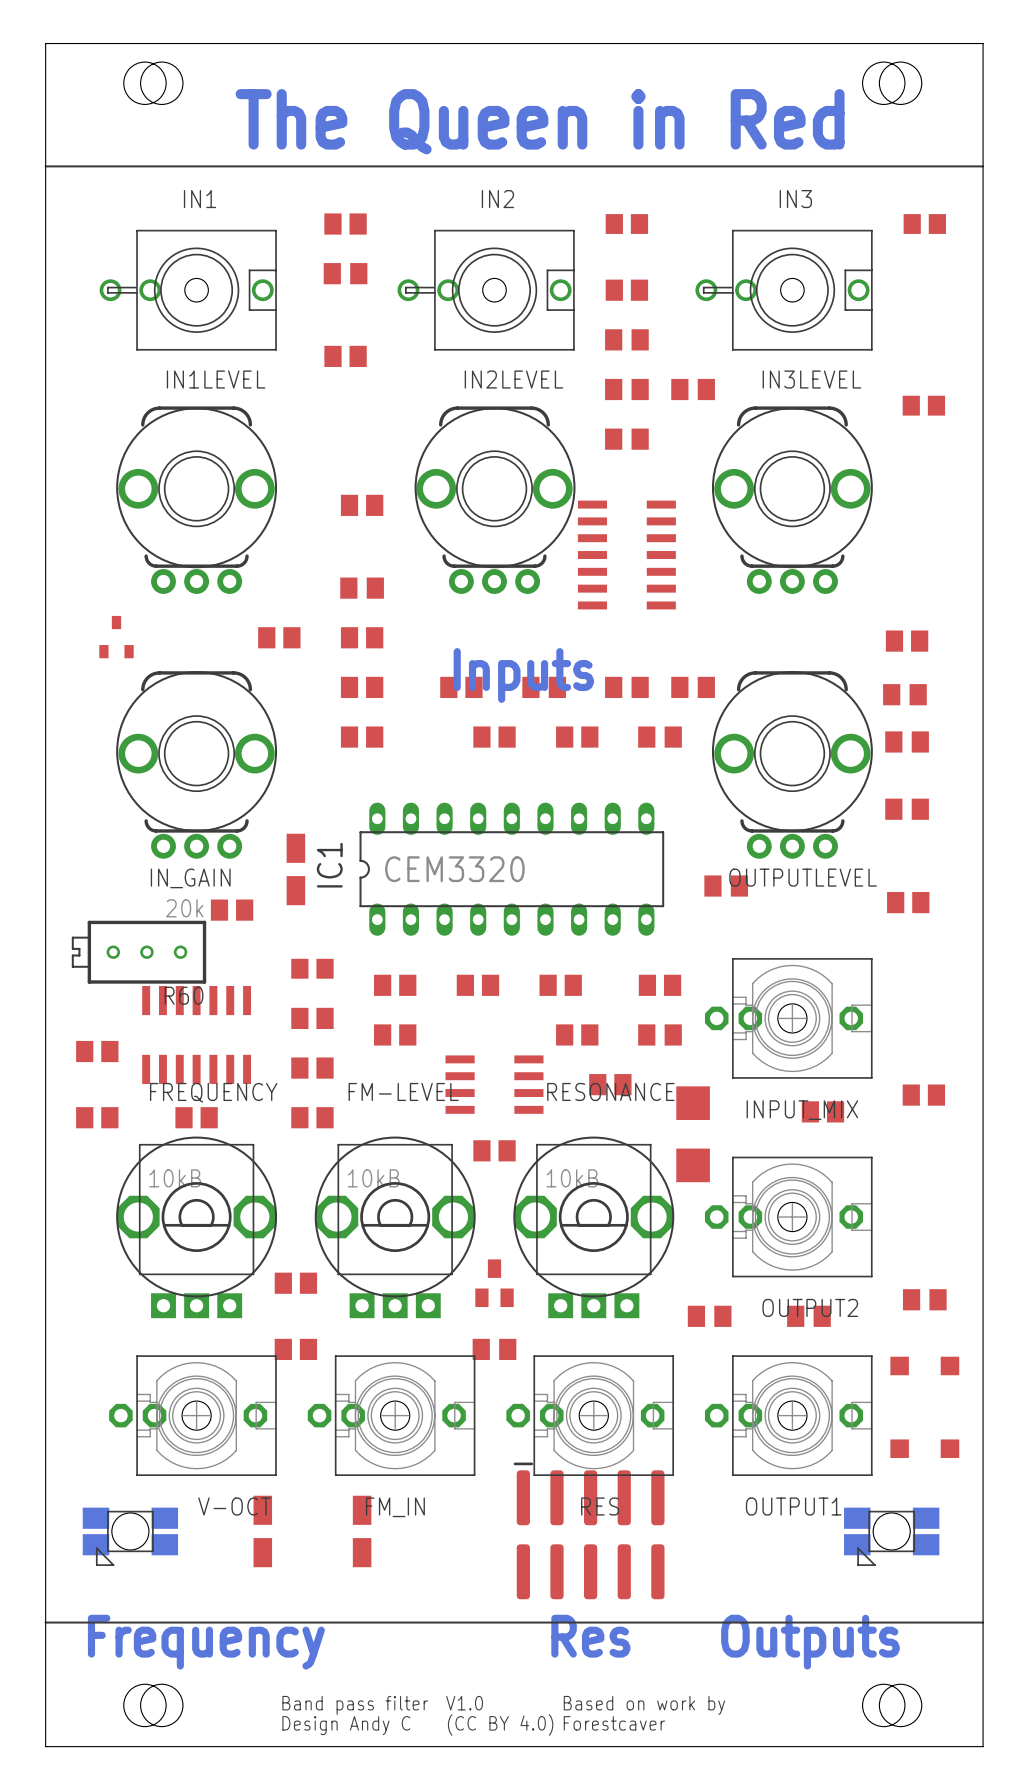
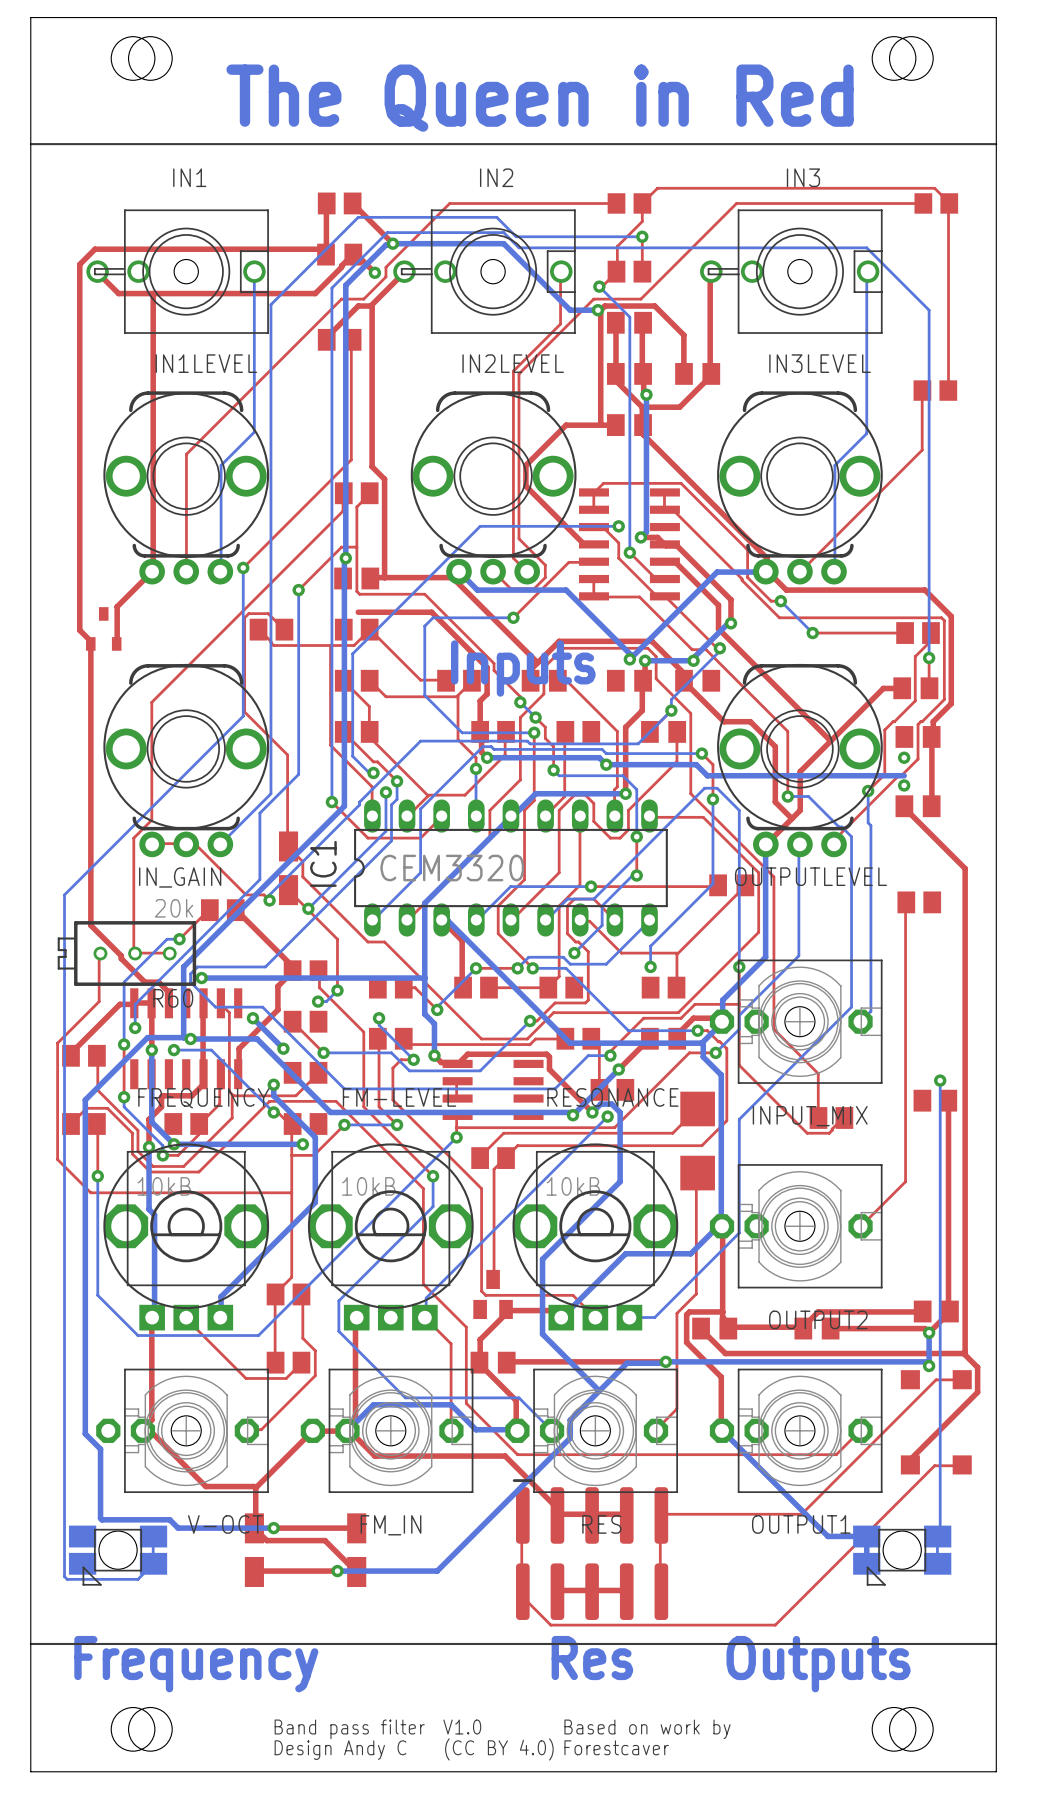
top track: none -> (326, 203) (326, 254) (325, 249) (95, 249) (79, 264) (79, 630) (90, 641) (90, 643)
top track: none -> (352, 203) (392, 243)
top track: none -> (616, 203) (449, 203) (385, 267) (385, 276) (363, 299) (341, 299) (186, 454) (186, 571)
top track: none -> (642, 203) (657, 188) (934, 188) (949, 203) (948, 390)
top track: none -> (642, 203) (642, 221) (617, 246) (617, 271) (602, 286) (599, 286)
top track: none -> (923, 203) (736, 203) (640, 299) (593, 299) (518, 373) (518, 538) (545, 565) (545, 577) (534, 588) (510, 588) (493, 571)
top track: none -> (642, 236) (642, 271)
bottom track: none -> (642, 236) (516, 236) (496, 217) (358, 217) (270, 304) (270, 793) (220, 844)
via: none -> (642, 236)
via: none -> (392, 243)
top track: none -> (97, 271) (118, 293) (315, 293) (353, 254) (358, 256) (374, 272)
bottom track: none -> (254, 271) (254, 432) (221, 465) (220, 571)
top track: none -> (404, 271) (370, 306)
top track: none -> (561, 271) (560, 324) (513, 371) (513, 558) (527, 571)
top track: none -> (711, 271) (710, 376) (679, 407) (642, 407)
bottom track: none -> (868, 271) (866, 433) (834, 465) (834, 571)
via: none -> (374, 272)
bottom track: none -> (599, 286) (629, 317) (629, 552)
via: none -> (599, 286)
top track: none -> (153, 293) (153, 569) (117, 606) (116, 643)
top track: none -> (370, 306) (358, 306) (326, 339)
top track: none -> (370, 306) (372, 466) (384, 479) (384, 577)
bottom track: none -> (597, 310) (570, 310) (503, 243) (385, 245) (345, 285) (344, 806) (183, 966) (183, 1037)
via: none -> (597, 310)
top track: none -> (600, 310) (604, 306) (654, 306) (683, 335) (684, 373)
top track: none -> (600, 310) (600, 425)
top track: none -> (615, 322) (615, 373)
top track: none -> (643, 322) (642, 372) (643, 391) (646, 394)
top track: none -> (352, 339) (351, 459) (243, 567)
top track: none -> (615, 373) (615, 380) (642, 407)
top track: none -> (922, 390) (922, 450) (799, 571)
bottom track: none -> (646, 394) (646, 531) (640, 537)
via: none -> (646, 394)
top track: none -> (642, 407) (643, 434) (767, 558) (765, 571) (767, 570) (786, 590) (924, 590) (951, 616) (951, 703) (933, 721) (931, 736)
top track: none -> (615, 425) (566, 425) (525, 465) (525, 486) (584, 544) (593, 544)
top track: none -> (664, 492) (664, 509) (674, 511) (779, 617) (941, 617) (944, 620) (944, 699) (918, 724) (918, 759) (902, 774) (900, 774) (834, 839) (834, 844)
top track: none -> (343, 493) (343, 511) (151, 702) (151, 820) (133, 838) (133, 953) (169, 953)
top track: none -> (369, 493) (356, 506) (356, 591) (359, 594) (424, 594) (494, 663) (494, 670) (520, 696) (520, 702)
top track: none -> (593, 509) (594, 492) (603, 483) (681, 483) (747, 549) (747, 577) (771, 601) (780, 601)
bottom track: none -> (618, 526) (480, 526) (352, 653) (352, 756) (369, 772) (373, 772)
via: none -> (618, 526)
top track: none -> (594, 527) (603, 527) (618, 542) (618, 558) (656, 595) (664, 595) (717, 648) (719, 648)
top track: none -> (640, 537) (657, 537) (665, 545) (676, 545) (730, 599) (730, 623)
via: none -> (640, 537)
top track: none -> (356, 547) (341, 547) (298, 590)
top track: none -> (629, 552) (656, 579) (664, 579)
via: none -> (629, 552)
via: none -> (345, 558)
top track: none -> (594, 561) (568, 562) (513, 617)
top track: none -> (664, 561) (675, 562) (718, 605) (718, 628) (830, 741)
bottom track: none -> (243, 567) (243, 716) (64, 894) (64, 1576) (67, 1579) (137, 1579) (153, 1563) (153, 1536)
via: none -> (243, 567)
bottom track: none -> (765, 571) (717, 572) (629, 659) (631, 655) (566, 590) (477, 590) (458, 571)
top track: none -> (370, 578) (452, 577) (458, 571) (453, 579) (537, 662)
top track: none -> (594, 579) (595, 597) (639, 597) (692, 649) (706, 649) (787, 731) (787, 796)
bottom track: none -> (298, 590) (298, 774) (259, 813) (259, 879) (135, 1004) (135, 1027)
via: none -> (298, 590)
bottom track: none -> (780, 601) (812, 633)
via: none -> (780, 601)
top track: none -> (358, 612) (431, 612) (487, 667) (487, 694) (480, 700) (480, 731) (481, 752) (487, 757)
bottom track: none -> (513, 617) (433, 617) (424, 626) (424, 695) (462, 732) (534, 732)
via: none -> (513, 617)
bottom track: none -> (730, 623) (728, 623) (692, 659) (693, 660) (645, 660)
via: none -> (730, 623)
top track: none -> (258, 629) (273, 645) (354, 645) (369, 629) (420, 680) (446, 680)
top track: none -> (284, 629) (268, 613) (248, 613) (244, 617) (244, 712) (287, 754) (287, 846) (302, 861) (302, 876) (367, 942) (384, 942) (481, 1039) (527, 1039) (553, 1012) (678, 1012) (758, 932) (758, 872) (703, 817) (649, 816)
via: none -> (812, 633)
top track: none -> (905, 633) (812, 633)
top track: none -> (930, 633) (930, 641) (915, 656) (915, 700) (884, 730) (884, 774) (868, 790)
top track: none -> (90, 644) (90, 925) (144, 982) (158, 982) (168, 991) (168, 1003)
top track: none -> (330, 645) (330, 745) (372, 786) (372, 816)
bottom track: none -> (719, 648) (719, 651) (671, 699) (671, 710) (638, 743) (420, 741) (269, 894) (269, 900)
via: none -> (719, 648)
top track: none -> (929, 657) (929, 688)
bottom track: none -> (929, 657) (929, 310) (866, 247) (518, 247) (503, 232) (387, 232) (331, 288) (331, 802)
via: none -> (929, 657)
via: none -> (629, 659)
top track: none -> (645, 660) (645, 678) (642, 682) (642, 710) (625, 727) (625, 793)
via: none -> (645, 660)
via: none -> (693, 660)
top track: none -> (343, 680) (369, 706) (370, 738) (428, 795)
top track: none -> (471, 680) (456, 696) (385, 696) (369, 680)
top track: none -> (530, 680) (531, 669) (559, 641) (652, 641) (683, 673) (685, 682) (724, 721) (750, 721) (775, 746) (775, 802) (791, 818)
top track: none -> (557, 680) (567, 681) (617, 731) (617, 786) (614, 789) (614, 816)
top track: none -> (902, 688) (883, 688) (800, 771) (800, 810) (765, 844)
top track: none -> (457, 696) (458, 739) (476, 757) (476, 768)
bottom track: none -> (520, 702) (535, 717)
via: none -> (520, 702)
via: none -> (671, 710)
top track: none -> (535, 717) (545, 727) (545, 738) (553, 746) (553, 770)
via: none -> (535, 717)
top track: none -> (343, 731) (373, 761) (377, 761) (397, 781)
top track: none -> (506, 731) (505, 754) (464, 795) (428, 795) (407, 816)
top track: none -> (534, 732) (534, 800) (524, 810) (524, 879) (498, 905) (498, 933) (532, 968)
via: none -> (534, 732)
top track: none -> (565, 731) (564, 796) (545, 816)
top track: none -> (677, 731) (676, 761) (628, 810) (628, 829) (620, 838) (610, 838) (593, 821) (593, 803) (585, 795) (574, 795) (559, 810) (559, 872) (510, 919)
top track: none -> (931, 736) (931, 806)
top track: none -> (701, 753) (712, 764) (712, 799)
bottom track: none -> (701, 753) (606, 753) (602, 749) (494, 749) (491, 746) (482, 746) (420, 809) (420, 872) (372, 919)
via: none -> (701, 753)
bottom track: none -> (487, 757) (599, 757) (606, 764) (696, 764) (707, 775) (904, 775)
via: none -> (487, 757)
via: none -> (904, 757)
via: none -> (606, 764)
bottom track: none -> (476, 768) (476, 816)
via: none -> (476, 768)
bottom track: none -> (553, 770) (559, 775) (622, 775) (636, 789) (636, 836)
via: none -> (553, 770)
via: none -> (373, 772)
bottom track: none -> (397, 781) (397, 799) (391, 804) (391, 840) (265, 966) (197, 966) (190, 973) (190, 982) (215, 1007) (262, 1007) (344, 1088) (555, 1088) (588, 1055) (610, 1055)
via: none -> (397, 781)
via: none -> (904, 785)
bottom track: none -> (868, 790) (868, 822) (870, 825) (870, 1011) (860, 1021)
via: none -> (868, 790)
bottom track: none -> (385, 792) (385, 831) (308, 908)
via: none -> (385, 792)
bottom track: none -> (625, 793) (535, 793) (424, 903) (424, 1014) (434, 1023) (434, 1055)
via: none -> (625, 793)
bottom track: none -> (787, 796) (808, 796) (851, 836) (851, 1007) (739, 1119) (739, 1232) (654, 1317) (629, 1317)
via: none -> (787, 796)
bottom track: none -> (712, 799) (712, 883) (650, 946) (650, 966)
via: none -> (712, 799)
top track: none -> (331, 802) (367, 838) (420, 838) (441, 816)
via: none -> (331, 802)
top track: none -> (904, 806) (965, 868) (963, 1353)
top track: none -> (580, 816) (579, 885) (559, 905) (559, 976) (548, 987)
top track: none -> (636, 836) (636, 875)
via: none -> (636, 836)
top track: none -> (152, 844) (196, 845) (246, 894) (264, 894) (269, 900)
bottom track: none -> (765, 844) (765, 957) (722, 1000) (722, 1021) (701, 1043)
bottom track: none -> (799, 844) (798, 955) (739, 1015) (739, 1029) (715, 1052)
bottom track: none -> (636, 875) (632, 875) (602, 905) (602, 925) (574, 953)
via: none -> (636, 875)
top track: none -> (718, 885) (591, 886)
top track: none -> (745, 885) (676, 954) (676, 987)
bottom track: none -> (591, 886) (510, 886) (476, 919)
via: none -> (591, 886)
top track: none -> (288, 890) (337, 939) (337, 990)
via: none -> (269, 900)
top track: none -> (906, 902) (905, 1181) (860, 1226)
via: none -> (308, 908)
top track: none -> (209, 910) (179, 939)
top track: none -> (235, 910) (291, 965) (292, 970) (277, 986) (277, 1009) (239, 1048) (238, 1074)
top track: none -> (407, 919) (489, 838) (489, 810) (520, 779) (520, 717) (543, 694) (543, 667) (563, 648) (647, 648) (656, 656) (656, 678) (690, 713) (690, 793) (773, 876) (773, 1029) (818, 1073) (818, 1117)
top track: none -> (441, 919) (462, 940) (463, 987)
bottom track: none -> (441, 919) (448, 921) (570, 1043) (701, 1043)
bottom track: none -> (545, 919) (567, 899) (593, 899) (704, 788) (717, 788) (739, 810) (739, 966)
top track: none -> (580, 919) (589, 921) (621, 953) (677, 953)
top track: none -> (614, 919) (593, 899) (574, 899) (567, 905) (567, 933) (588, 951) (588, 1000) (585, 1002) (555, 1002) (537, 1021) (530, 1021)
bottom track: none -> (649, 919) (606, 964) (570, 964) (563, 957) (528, 957) (517, 968)
bottom track: none -> (179, 939) (167, 939) (124, 982) (124, 1044)
via: none -> (179, 939)
via: none -> (574, 953)
top track: none -> (100, 953) (99, 1001) (57, 1043) (57, 1159) (90, 1192) (291, 1192)
via: none -> (650, 966)
top track: none -> (739, 966) (739, 1065) (807, 1133) (829, 1133) (844, 1117)
via: none -> (739, 966)
bottom track: none -> (476, 968) (437, 1007) (437, 1009)
via: none -> (476, 968)
top track: none -> (517, 968) (476, 968)
via: none -> (517, 968)
bottom track: none -> (532, 968) (566, 968) (628, 1030) (697, 1030)
via: none -> (532, 968)
top track: none -> (318, 970) (319, 987) (363, 1032) (363, 1106) (433, 1176)
via: none -> (201, 978)
bottom track: none -> (424, 978) (201, 978)
top track: none -> (403, 987) (415, 987) (437, 1009)
top track: none -> (488, 987) (548, 987)
bottom track: none -> (337, 990) (326, 1001) (318, 1001)
via: none -> (337, 990)
via: none -> (318, 1001)
top track: none -> (203, 1003) (203, 1084) (191, 1095) (161, 1097) (161, 1106) (149, 1119) (149, 1147)
top track: none -> (220, 1003) (229, 1012) (229, 1091) (233, 1095) (295, 1095) (318, 1072)
top track: none -> (739, 1004) (694, 1004) (681, 1018) (643, 1018) (610, 1051) (610, 1055)
via: none -> (437, 1009)
bottom track: none -> (252, 1018) (283, 1048)
via: none -> (252, 1018)
bottom track: none -> (379, 1018) (379, 1025) (413, 1059)
via: none -> (379, 1018)
bottom track: none -> (530, 1021) (480, 1070) (409, 1070) (391, 1052) (323, 1052)
via: none -> (530, 1021)
top track: none -> (292, 1021) (323, 1052)
top track: none -> (721, 1021) (718, 1018) (693, 1018) (678, 1033) (677, 1038)
via: none -> (135, 1027)
top track: none -> (697, 1030) (707, 1030) (726, 1048) (726, 1120) (701, 1145) (517, 1145) (494, 1169) (493, 1279)
via: none -> (697, 1030)
top track: none -> (377, 1038) (379, 1106) (397, 1124)
top track: none -> (565, 1038) (535, 1039) (530, 1044) (409, 1044) (403, 1038)
top track: none -> (591, 1038) (599, 1045) (599, 1089)
top track: none -> (649, 1038) (618, 1069)
via: none -> (190, 1039)
bottom track: none -> (701, 1043) (703, 1057) (721, 1075) (721, 1226) (718, 1226) (690, 1253) (625, 1253) (561, 1317)
top track: none -> (124, 1044) (124, 1097)
via: none -> (124, 1044)
via: none -> (283, 1048)
top track: none -> (151, 1050) (151, 1003) (136, 1002) (119, 1004) (71, 1052) (71, 1055)
bottom track: none -> (151, 1050) (151, 1122) (173, 1144) (302, 1144)
via: none -> (151, 1050)
bottom track: none -> (173, 1050) (211, 1050) (273, 1112)
via: none -> (173, 1050)
via: none -> (323, 1052)
top track: none -> (715, 1052) (689, 1052) (614, 1127) (456, 1127)
via: none -> (715, 1052)
top track: none -> (96, 1055) (97, 1090) (137, 1130) (137, 1151) (153, 1166) (183, 1166) (232, 1117) (232, 1095)
top track: none -> (434, 1055) (441, 1062) (457, 1063) (467, 1054) (546, 1054) (549, 1057) (549, 1069) (592, 1112)
via: none -> (434, 1055)
via: none -> (610, 1055)
top track: none -> (413, 1059) (401, 1059) (392, 1068) (392, 1099) (481, 1188) (481, 1291) (485, 1295) (573, 1295) (595, 1317)
via: none -> (413, 1059)
bottom track: none -> (618, 1069) (573, 1115) (573, 1112) (330, 1112) (257, 1039) (147, 1037) (85, 1099) (85, 1433) (100, 1449) (100, 1518) (169, 1519) (178, 1528) (273, 1528)
via: none -> (618, 1069)
top track: none -> (220, 1074) (219, 1104) (199, 1123) (198, 1134) (178, 1155) (162, 1155)
bottom track: none -> (940, 1080) (940, 1535) (937, 1537) (937, 1563)
via: none -> (940, 1080)
top track: none -> (457, 1081) (457, 1098)
bottom track: none -> (273, 1084) (273, 1095) (315, 1137) (315, 1202) (221, 1296) (220, 1317)
via: none -> (273, 1084)
bottom track: none -> (124, 1097) (124, 1106) (162, 1145) (162, 1155)
via: none -> (124, 1097)
top track: none -> (948, 1100) (949, 1311) (929, 1332) (924, 1328) (830, 1328)
top track: none -> (697, 1108) (672, 1133) (503, 1133) (480, 1158)
top track: none -> (273, 1112) (277, 1112) (290, 1124) (292, 1123) (291, 1277) (275, 1293) (275, 1362)
via: none -> (273, 1112)
bottom track: none -> (592, 1112) (600, 1104) (611, 1104) (620, 1112) (620, 1181) (542, 1259) (542, 1334) (599, 1390)
via: none -> (592, 1112)
top track: none -> (457, 1115) (456, 1137)
via: none -> (573, 1115)
bottom track: none -> (607, 1116) (426, 1298) (424, 1317)
via: none -> (607, 1116)
top track: none -> (71, 1123) (86, 1108) (107, 1108) (132, 1133) (132, 1154) (150, 1172) (198, 1172) (269, 1101) (336, 1101) (423, 1188) (423, 1284) (466, 1327) (466, 1403) (517, 1454) (836, 1454) (860, 1430)
top track: none -> (96, 1123) (97, 1176)
top track: none -> (344, 1124) (313, 1155) (291, 1155)
via: none -> (344, 1124)
bottom track: none -> (397, 1124) (344, 1124)
via: none -> (397, 1124)
bottom track: none -> (456, 1137) (258, 1335) (137, 1335) (97, 1295) (97, 1176)
via: none -> (456, 1137)
via: none -> (173, 1144)
via: none -> (302, 1144)
bottom track: none -> (149, 1147) (149, 1209) (154, 1214) (154, 1316) (152, 1317)
via: none -> (149, 1147)
via: none -> (162, 1155)
top track: none -> (697, 1173) (696, 1293) (676, 1313) (676, 1408) (655, 1430)
via: none -> (97, 1176)
bottom track: none -> (433, 1176) (433, 1206) (338, 1300) (338, 1331) (405, 1397) (518, 1397) (552, 1430)
via: none -> (433, 1176)
top track: none -> (721, 1226) (722, 1317) (729, 1324) (728, 1328) (803, 1328) (818, 1311) (922, 1311)
top track: none -> (301, 1294) (302, 1338) (315, 1350) (315, 1375) (261, 1429) (246, 1430)
top track: none -> (722, 1311) (689, 1311) (686, 1314) (686, 1342) (721, 1377) (721, 1430)
top track: none -> (152, 1317) (151, 1420) (142, 1430) (151, 1432) (205, 1486) (255, 1487)
top track: none -> (186, 1317) (246, 1378) (286, 1378) (301, 1362)
top track: none -> (356, 1317) (355, 1421) (347, 1430)
top track: none -> (424, 1317) (451, 1343) (451, 1430)
top track: none -> (561, 1317) (553, 1310) (506, 1309) (506, 1313) (480, 1339) (480, 1364) (516, 1400) (517, 1430)
top track: none -> (701, 1328) (725, 1353) (963, 1353)
bottom track: none -> (929, 1332) (929, 1366) (927, 1361) (627, 1363) (570, 1420) (570, 1438) (437, 1571) (337, 1571)
via: none -> (929, 1332)
top track: none -> (963, 1353) (977, 1367) (977, 1392) (911, 1458) (910, 1464)
top track: none -> (665, 1361) (506, 1362)
via: none -> (665, 1361)
via: none -> (929, 1366)
top track: none -> (962, 1379) (936, 1379) (801, 1514) (661, 1514) (661, 1591)
top track: none -> (347, 1430) (312, 1430) (255, 1487)
top track: none -> (347, 1430) (374, 1456) (505, 1456) (557, 1508) (557, 1515) (626, 1515)
bottom track: none -> (517, 1430) (476, 1429) (451, 1404) (373, 1404) (347, 1430)
bottom track: none -> (721, 1430) (827, 1536) (866, 1536) (866, 1563)
top track: none -> (962, 1464) (934, 1465) (775, 1625) (550, 1625) (523, 1597) (522, 1515)
top track: none -> (255, 1487) (254, 1528) (266, 1540) (325, 1540) (356, 1571)
top track: none -> (273, 1528) (356, 1528)
via: none -> (273, 1528)
top track: none -> (337, 1571) (254, 1571)
via: none -> (337, 1571)
top track: none -> (626, 1591) (557, 1591)

